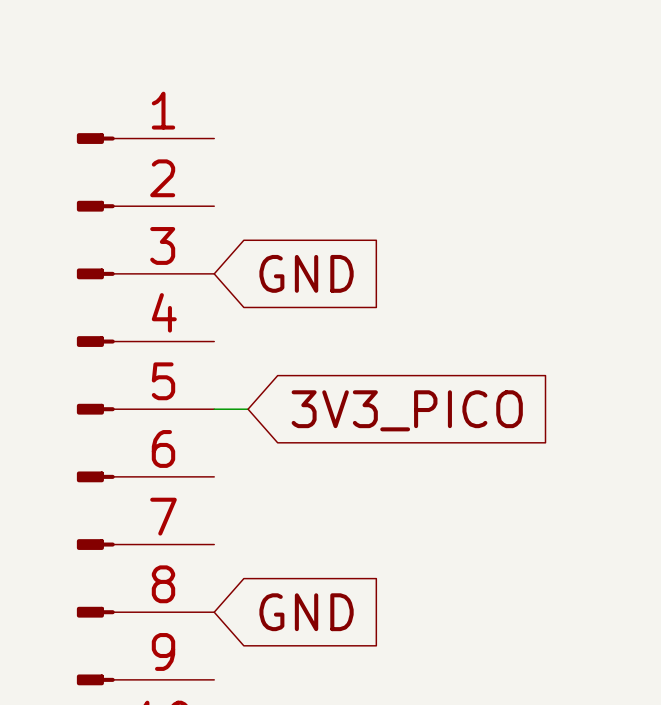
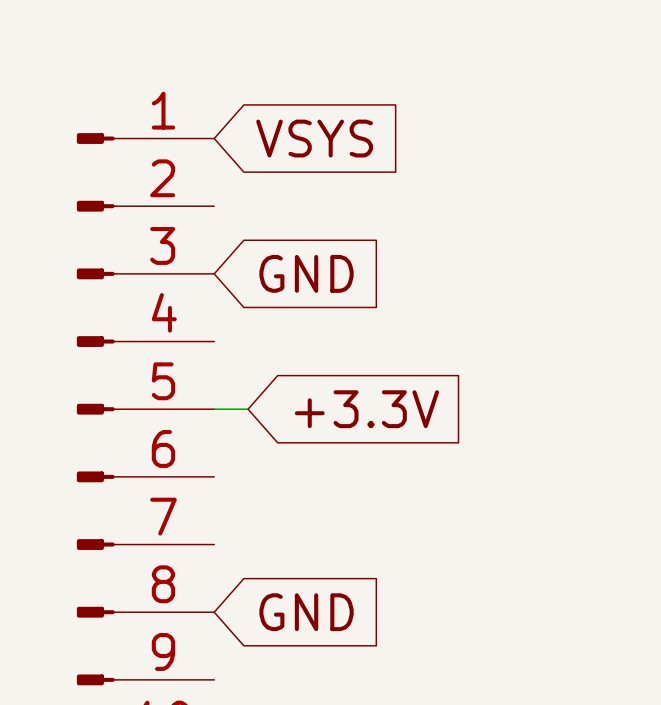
global label: none -> VSYS (314, 138)
global label: 3V3_PICO (407, 410) -> +3.3V (366, 409)

